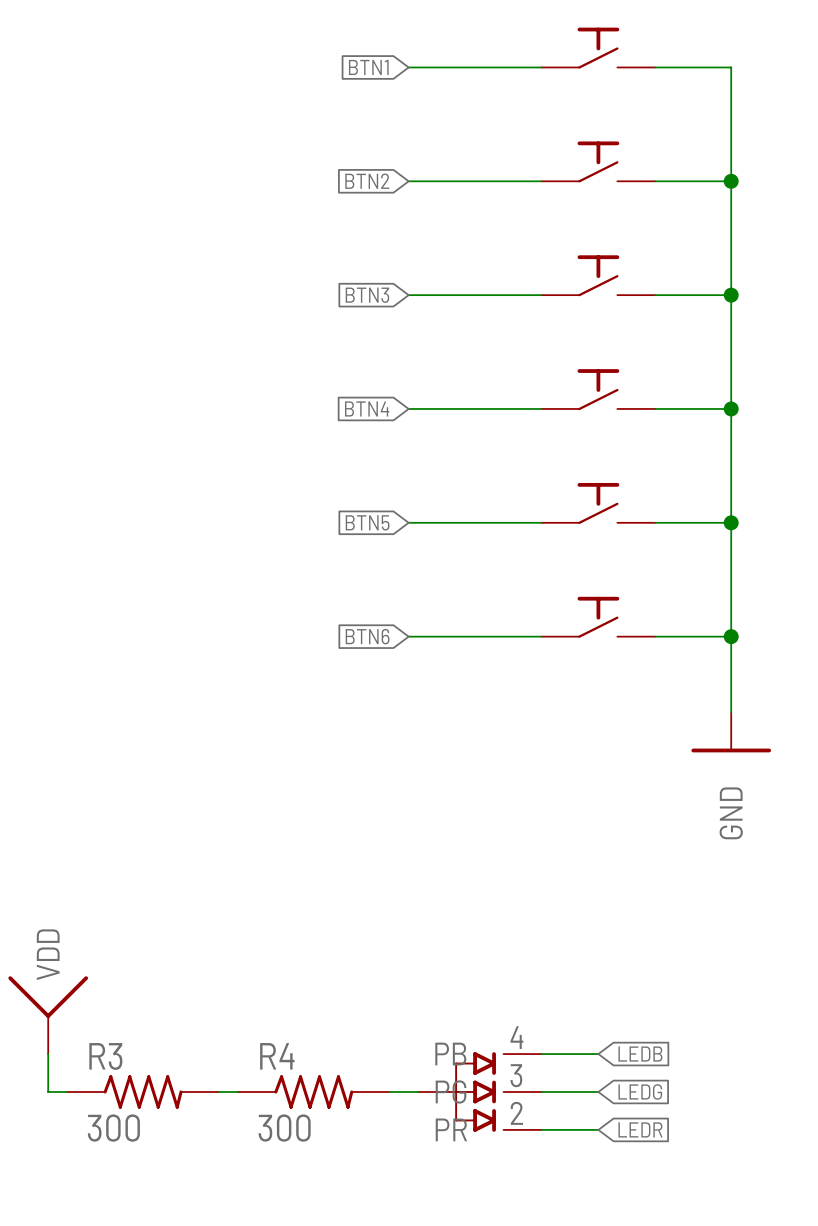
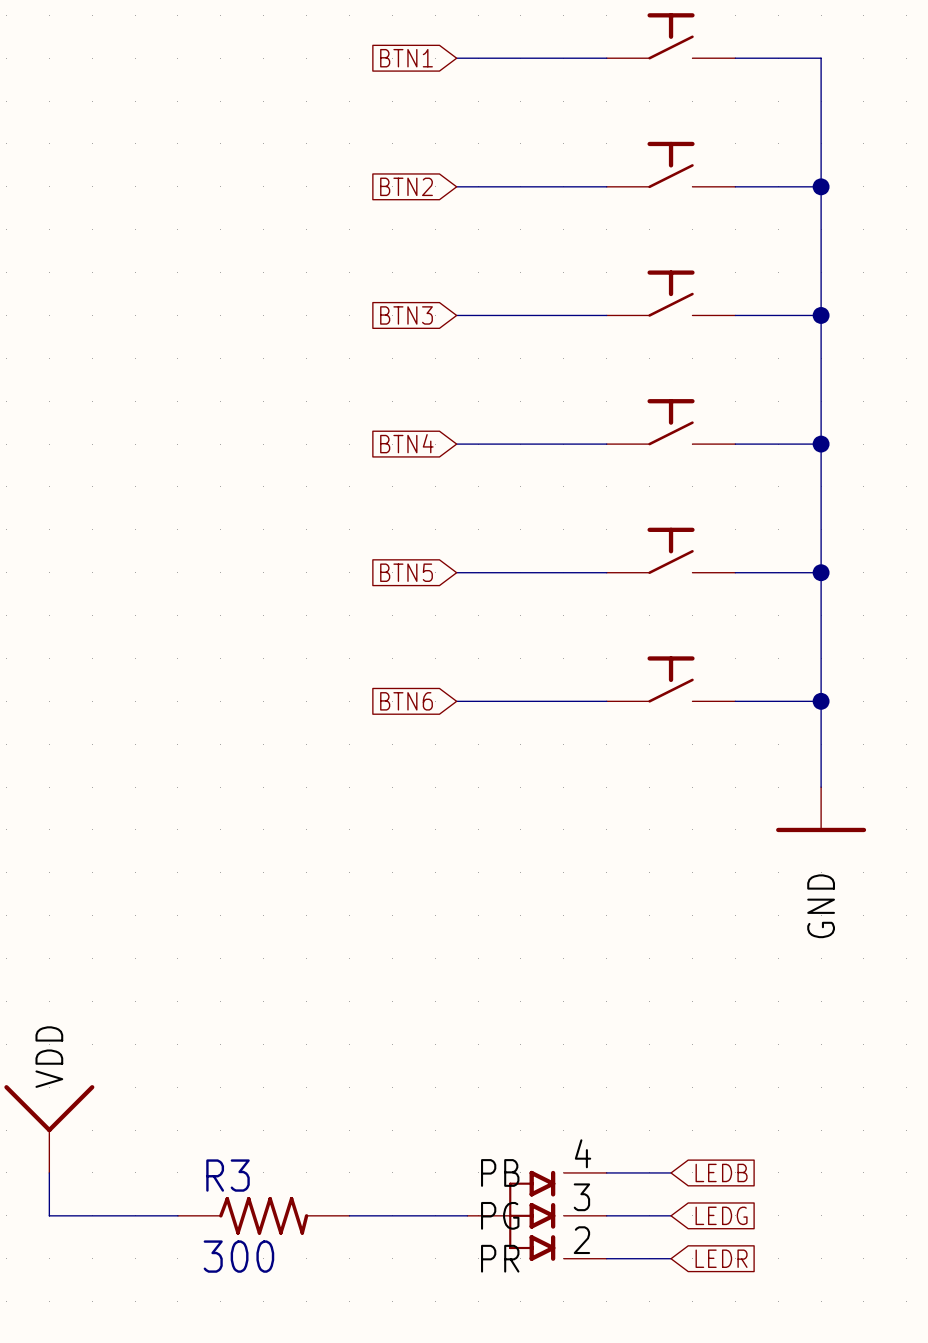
R3 position: (143, 1091) -> (263, 1215)
wire: (218, 1091) (237, 1091) -> none
R4: 300 (313, 1091) -> none

